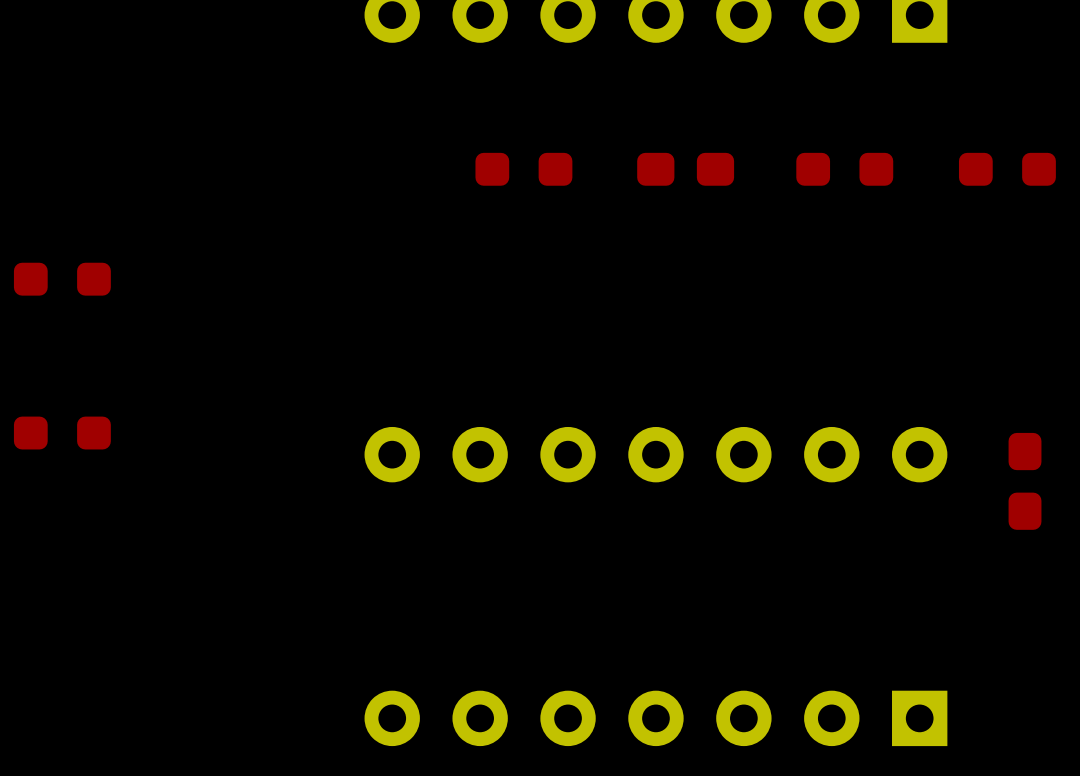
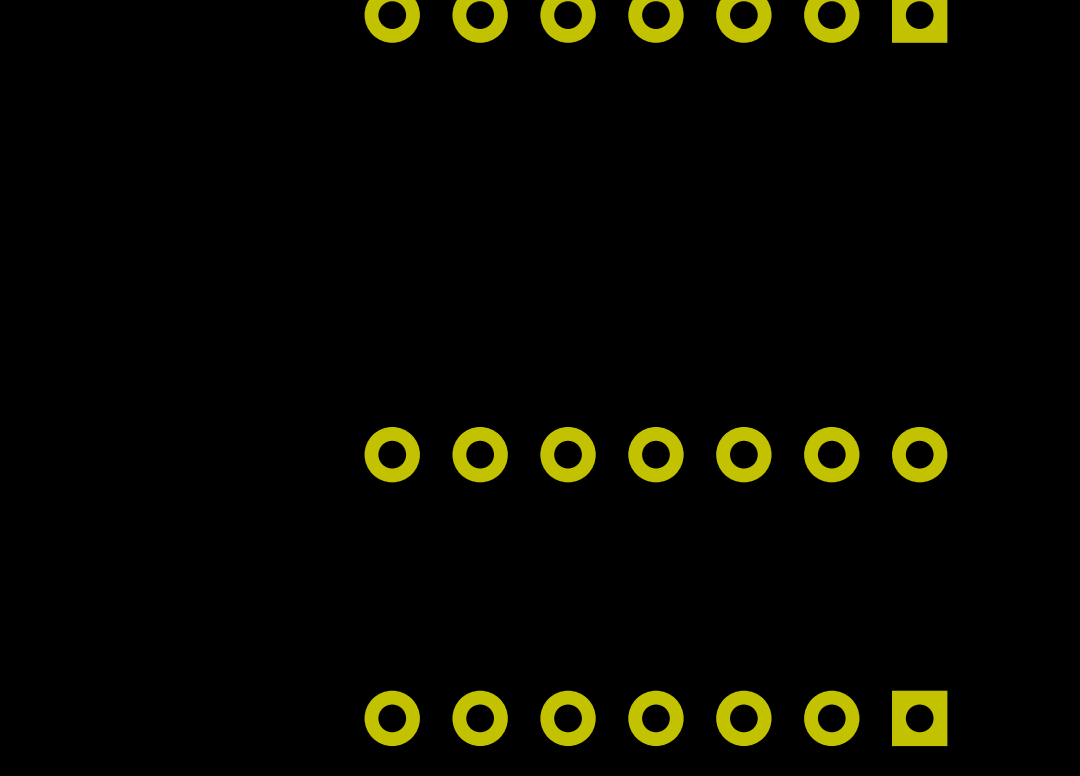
part: (523, 169) -> none
part: (685, 169) -> none
part: (844, 169) -> none
part: (1007, 169) -> none
part: (62, 279) -> none
part: (62, 433) -> none
part: (1025, 481) -> none

